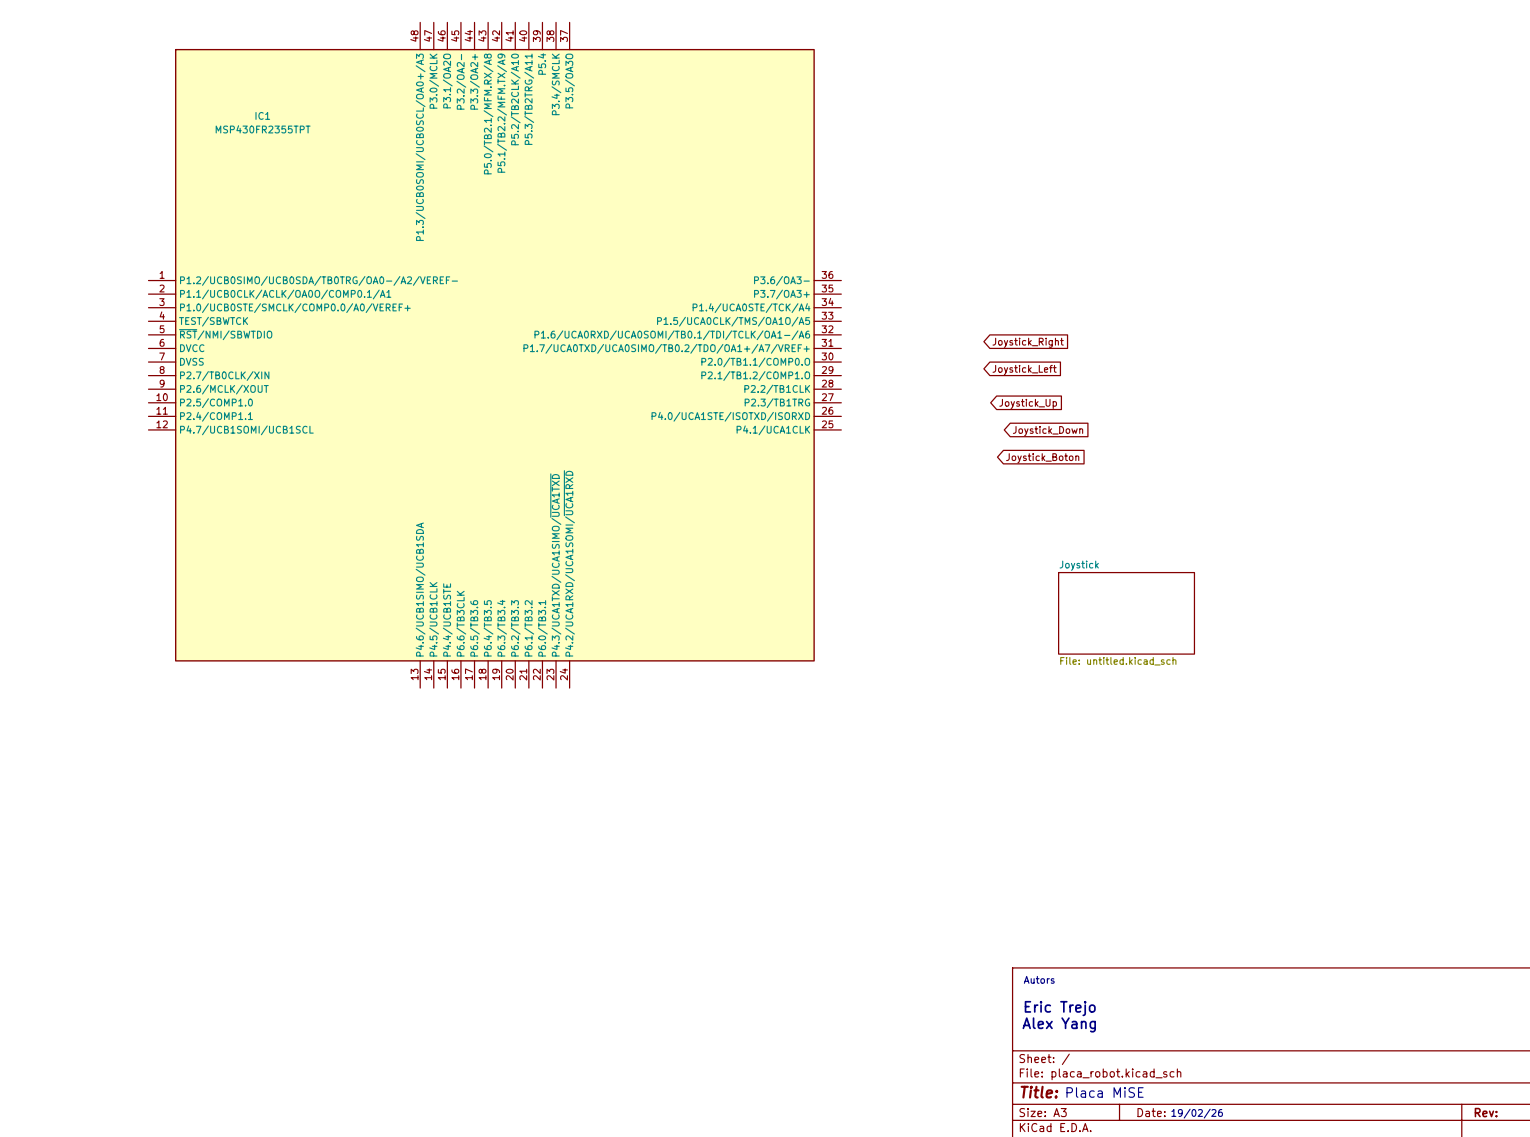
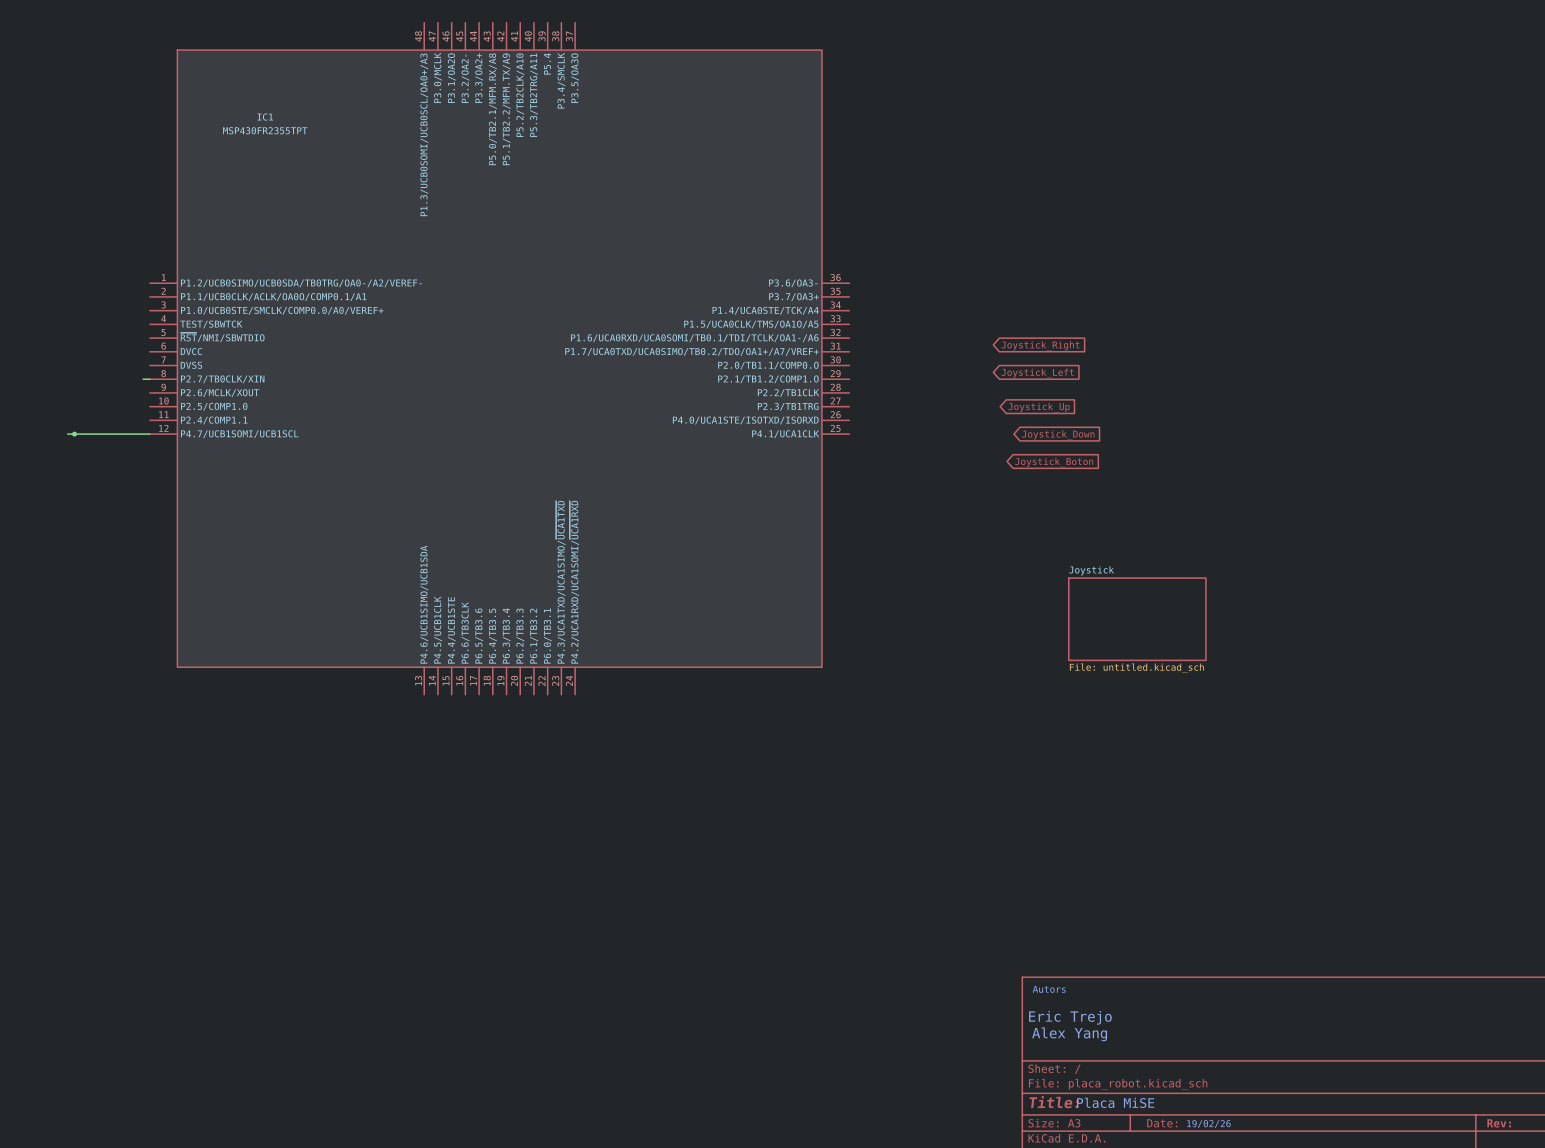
wire: none -> (143, 379) (149, 379)
wire: none -> (67, 434) (149, 434)
junction: none -> (74, 434)

